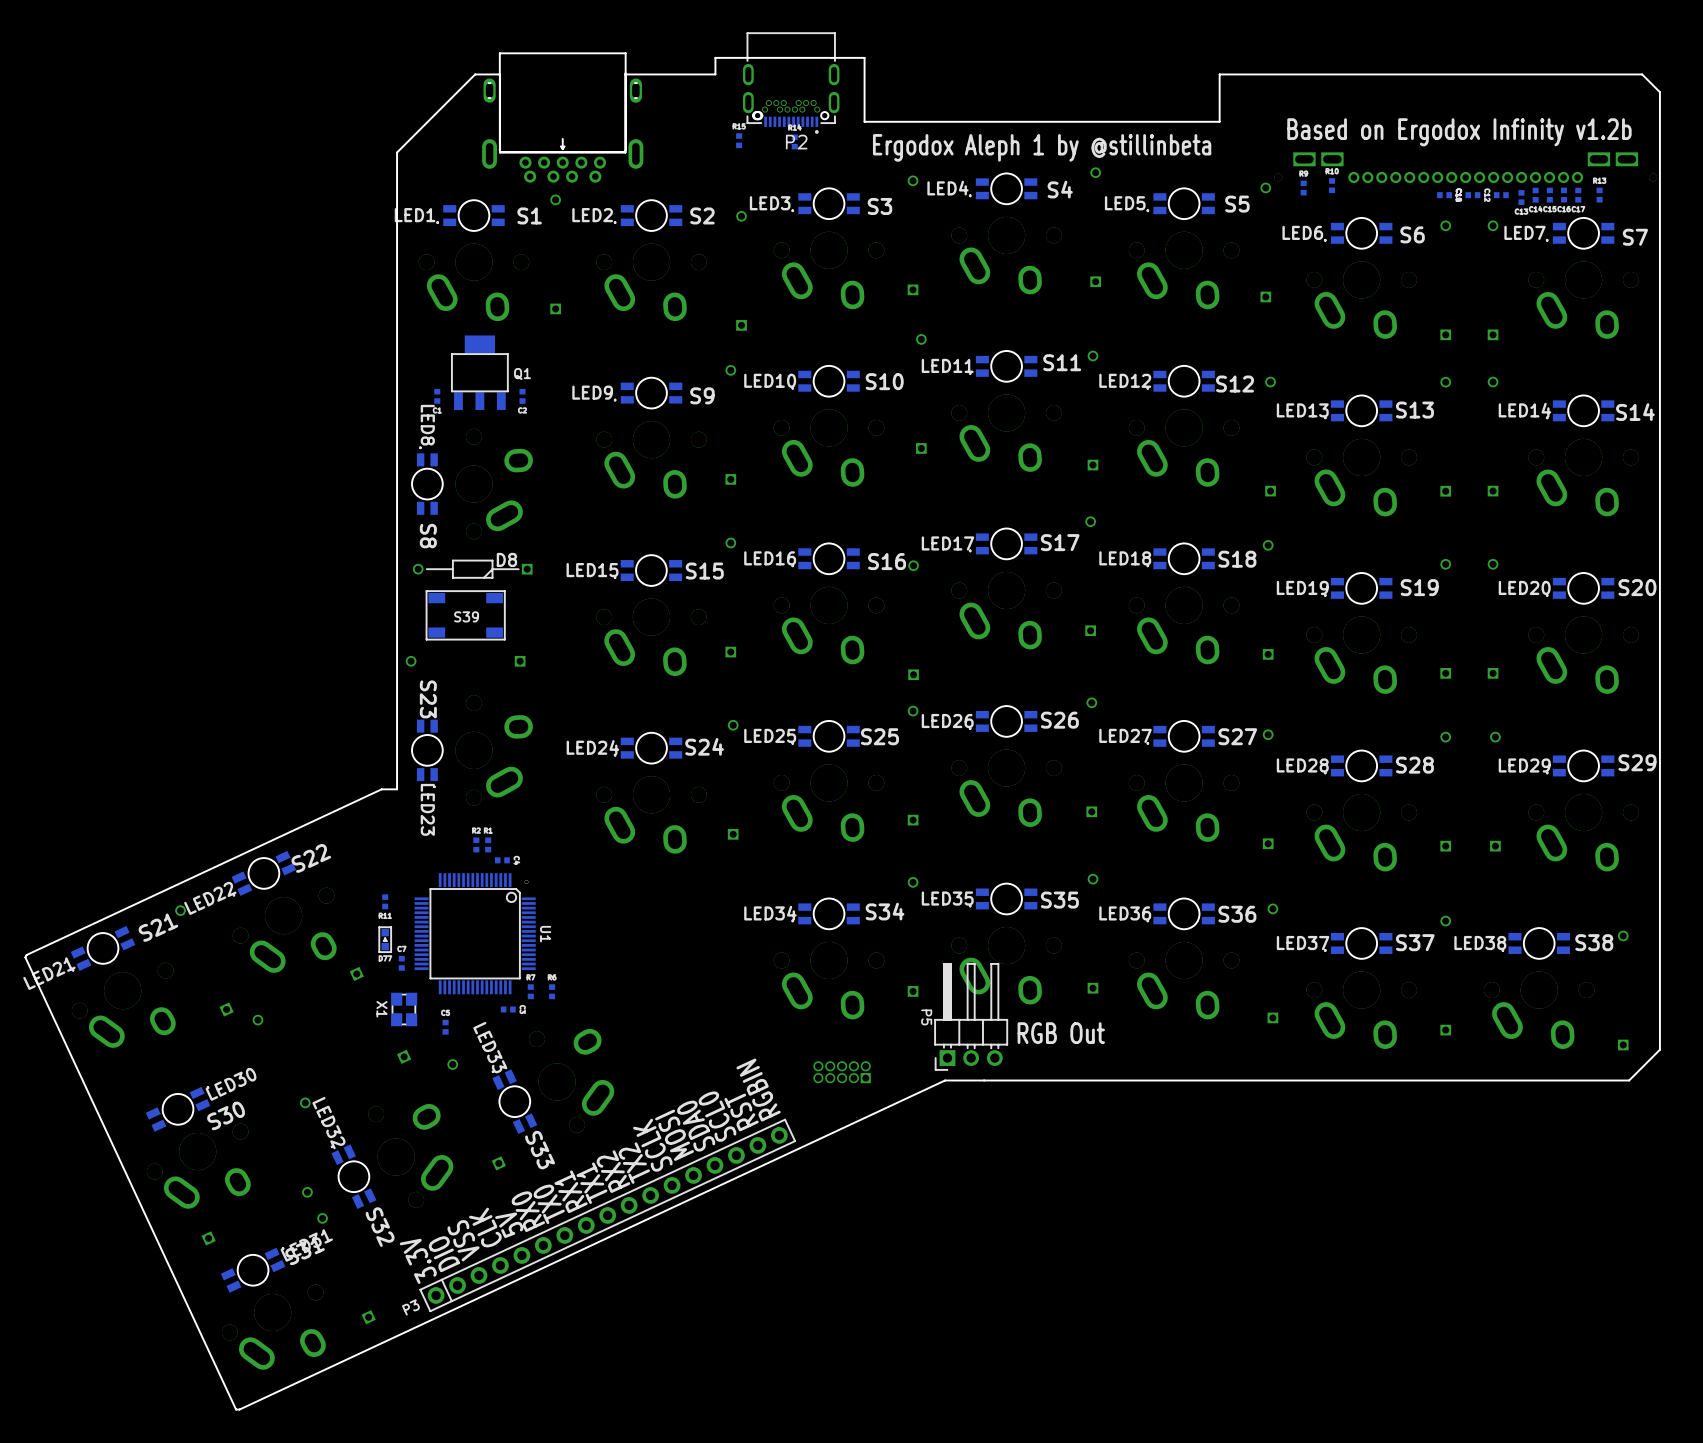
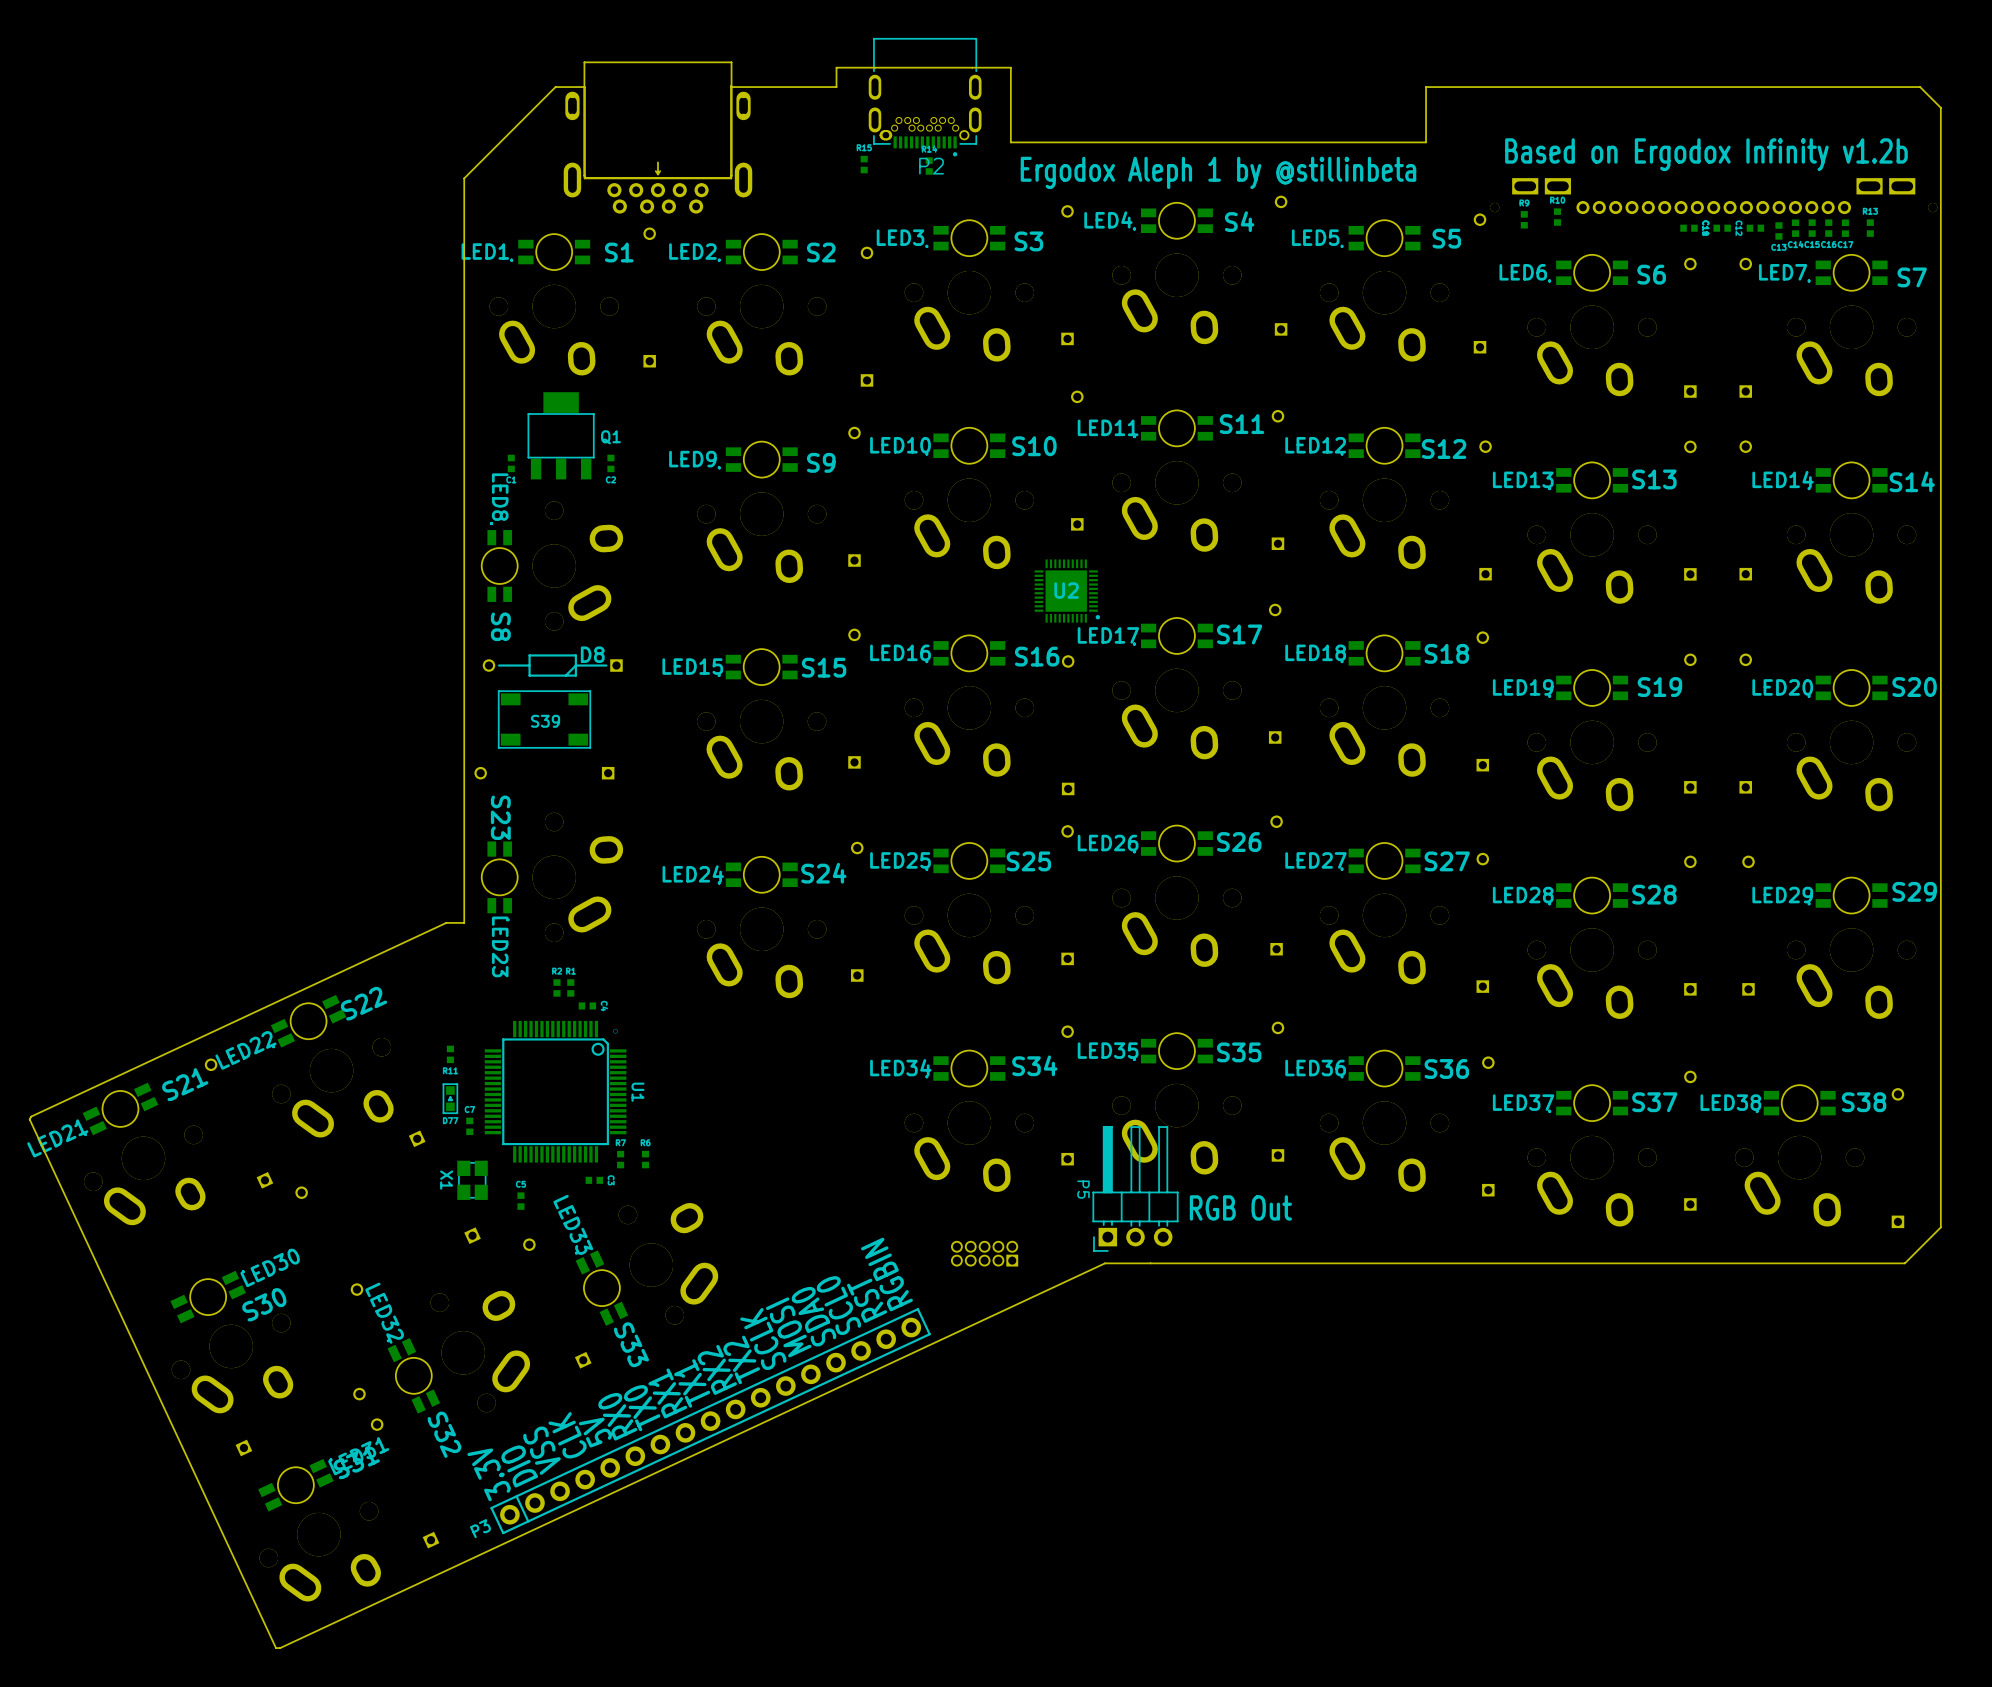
U2: none -> (1067, 591)

